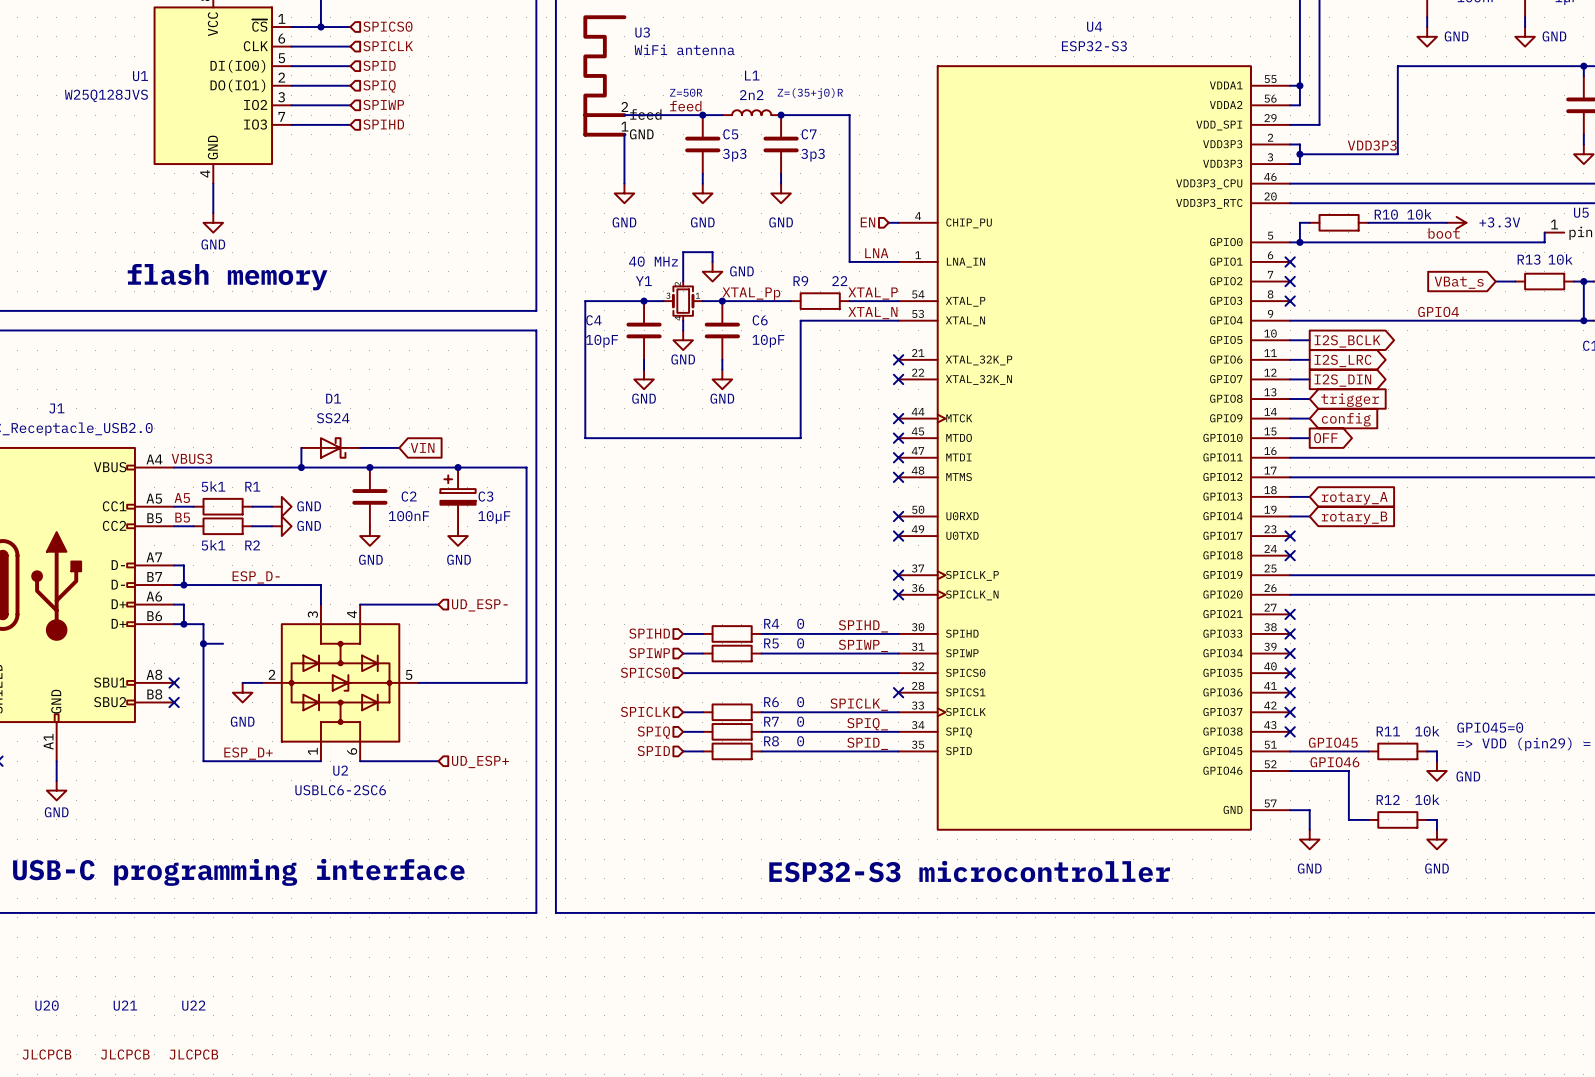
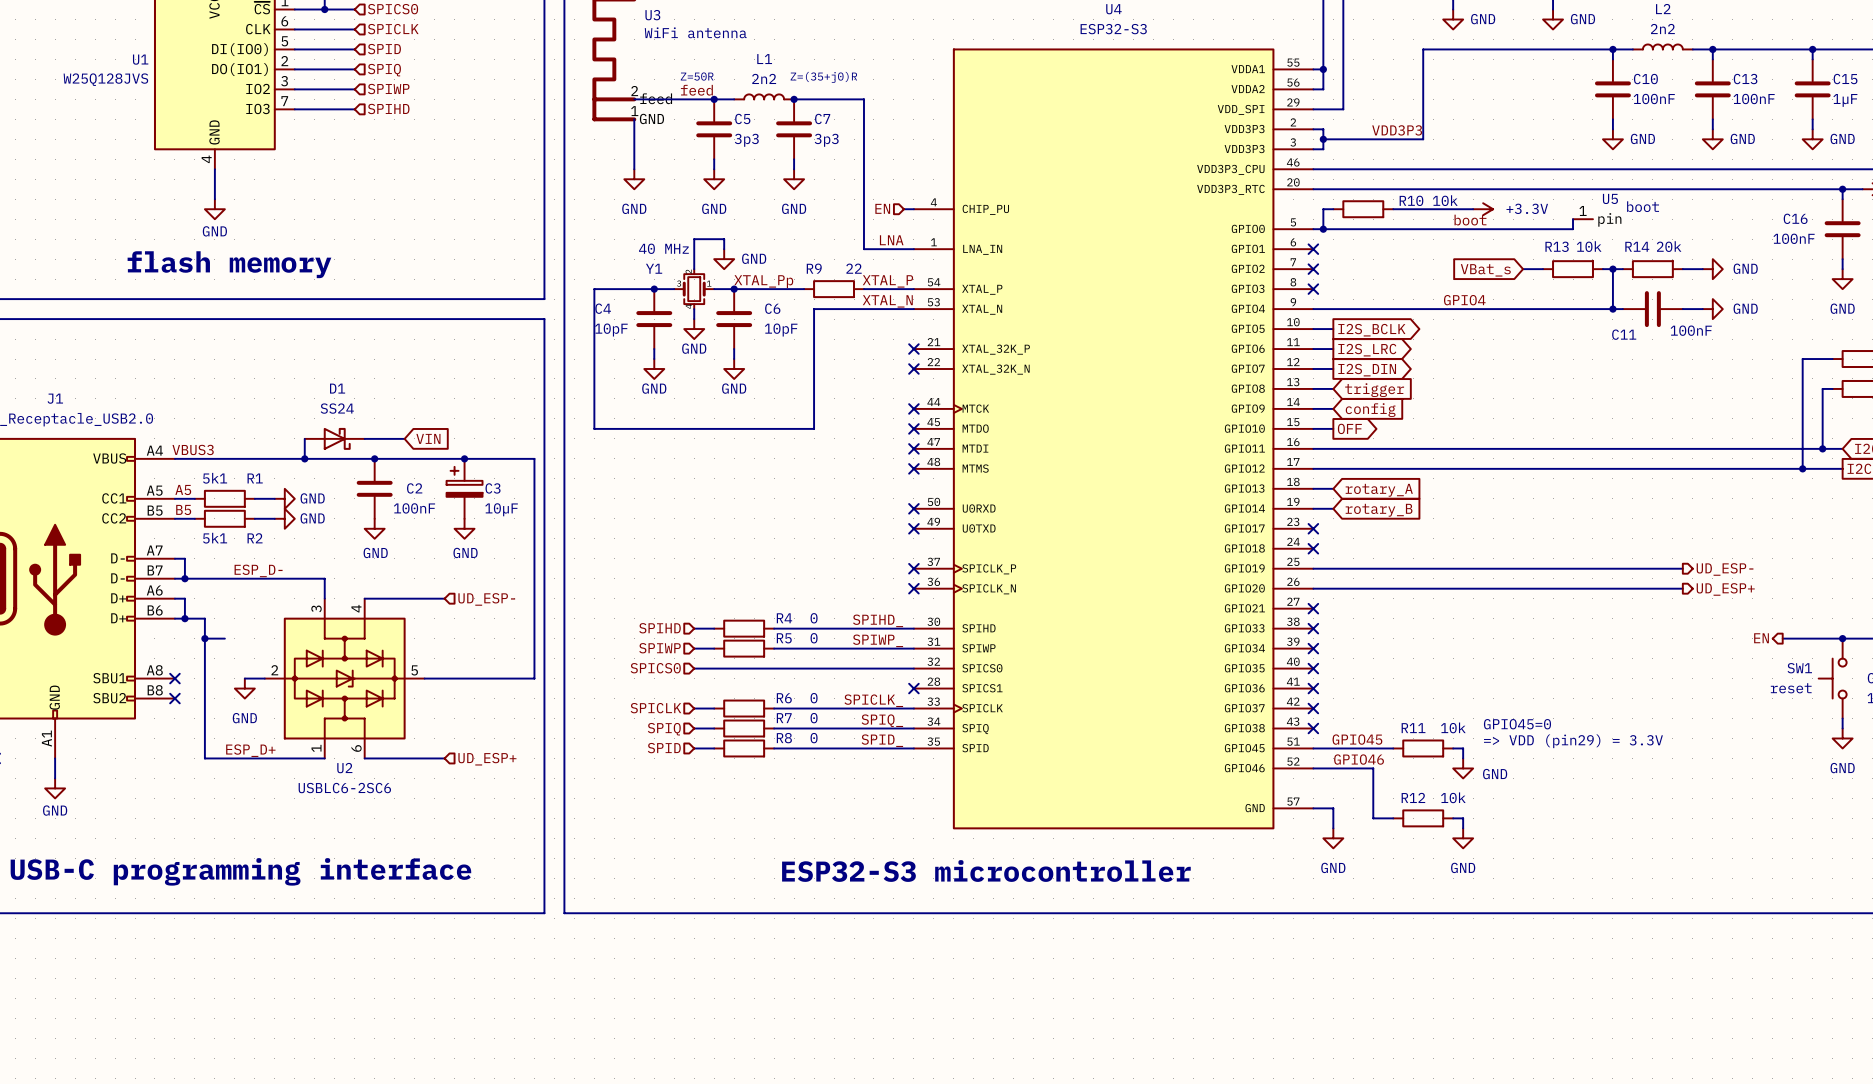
U20: (46, 1030) -> none
U21: (125, 1030) -> none
U22: (193, 1030) -> none

